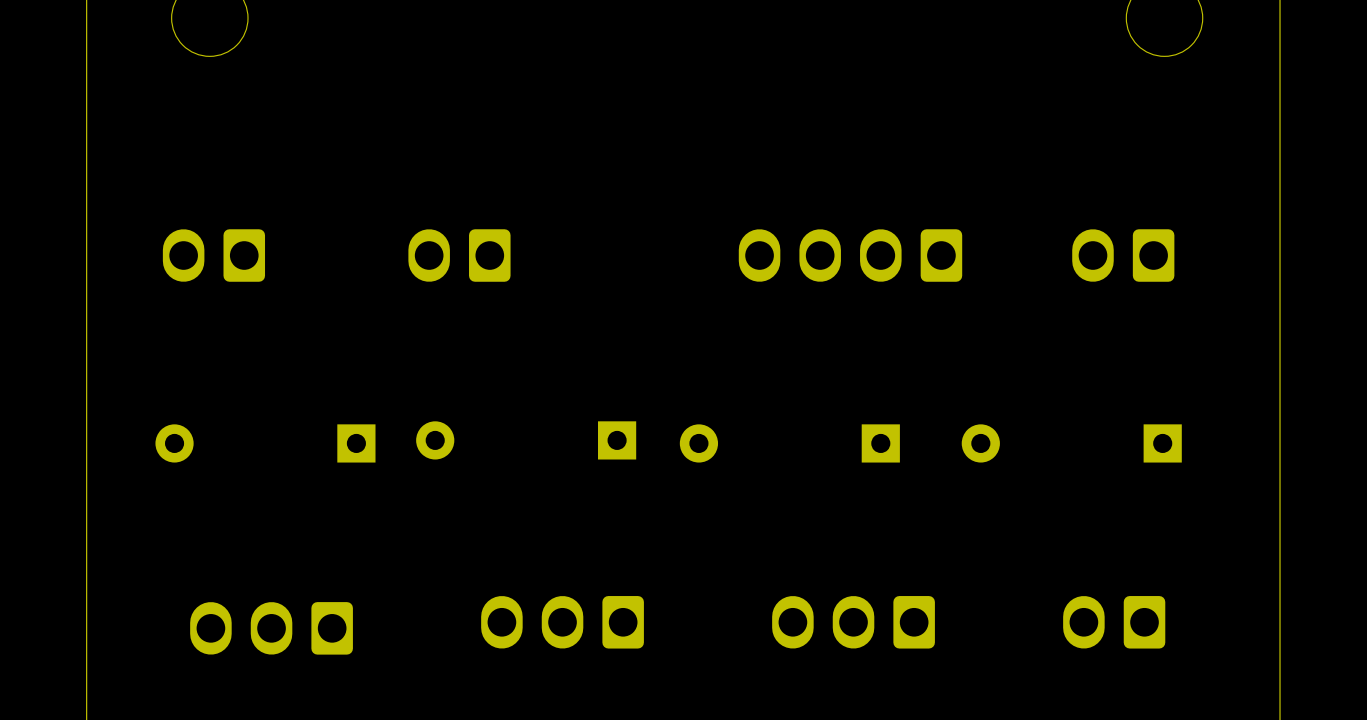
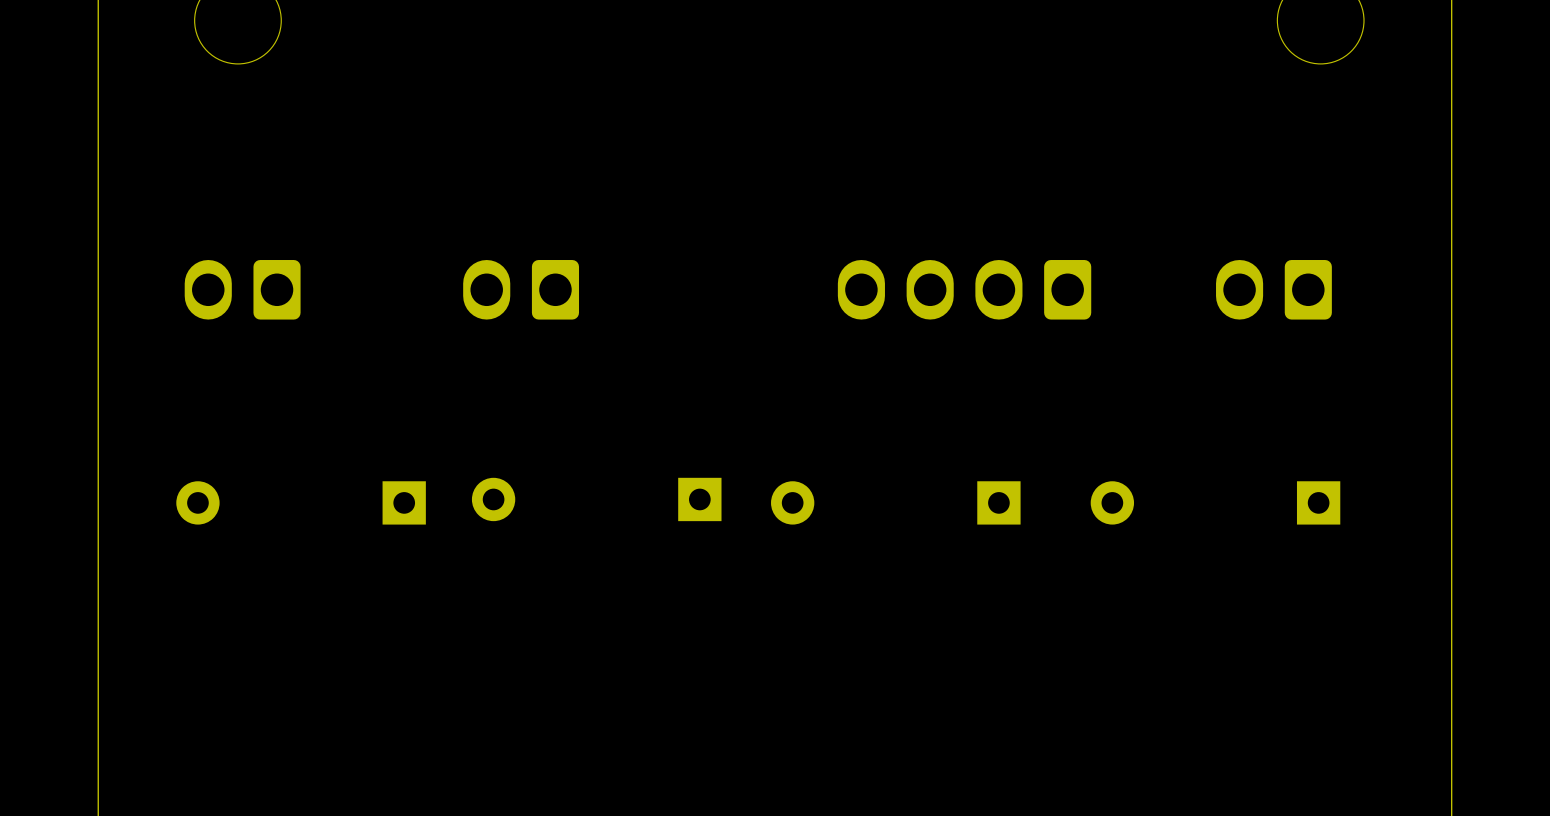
part: (562, 622) -> none
part: (853, 622) -> none
part: (1114, 622) -> none
part: (271, 628) -> none

